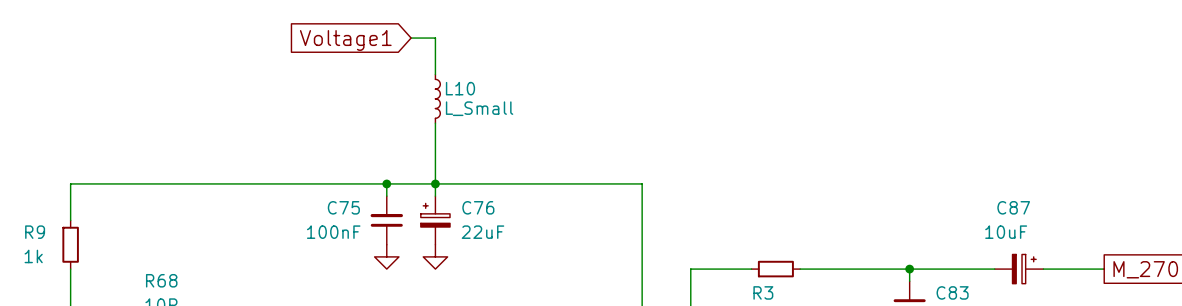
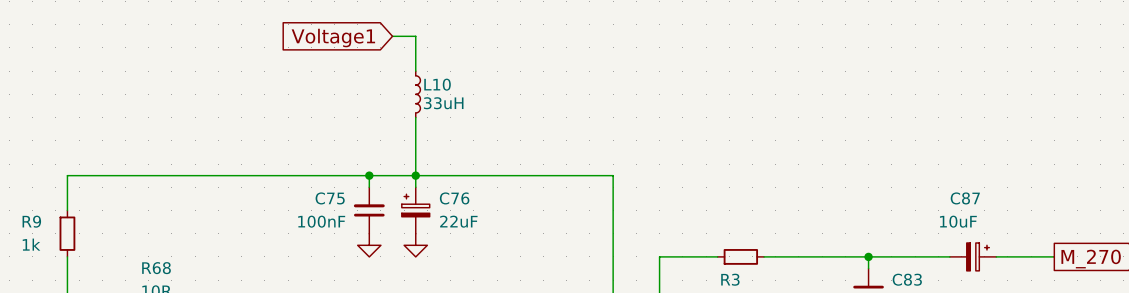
L10 value: L_Small (479, 108) -> 33uH (443, 103)

